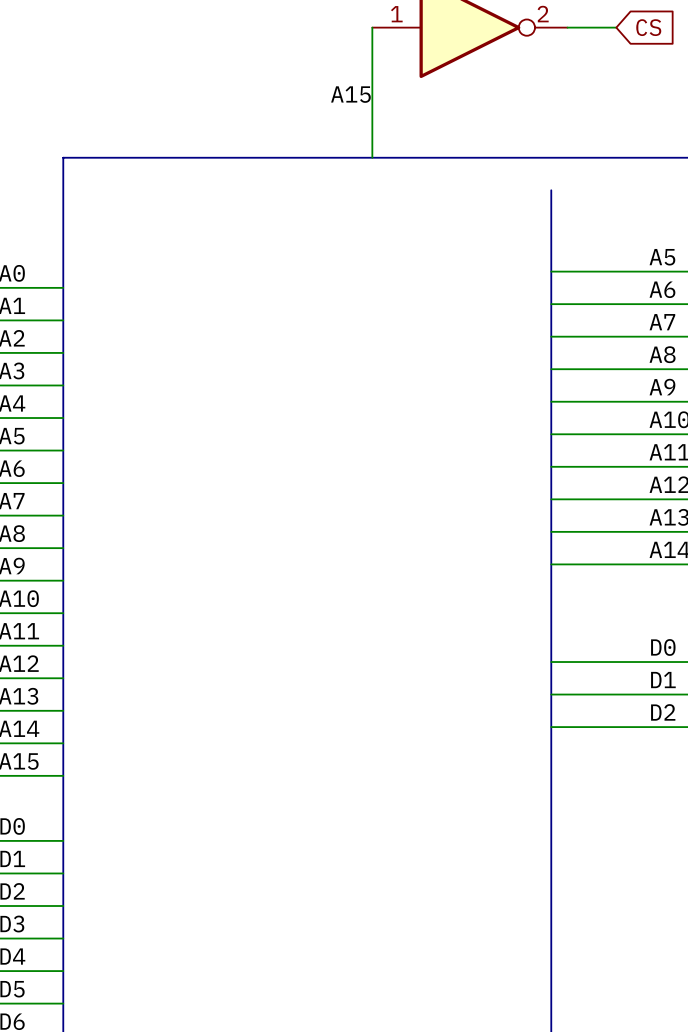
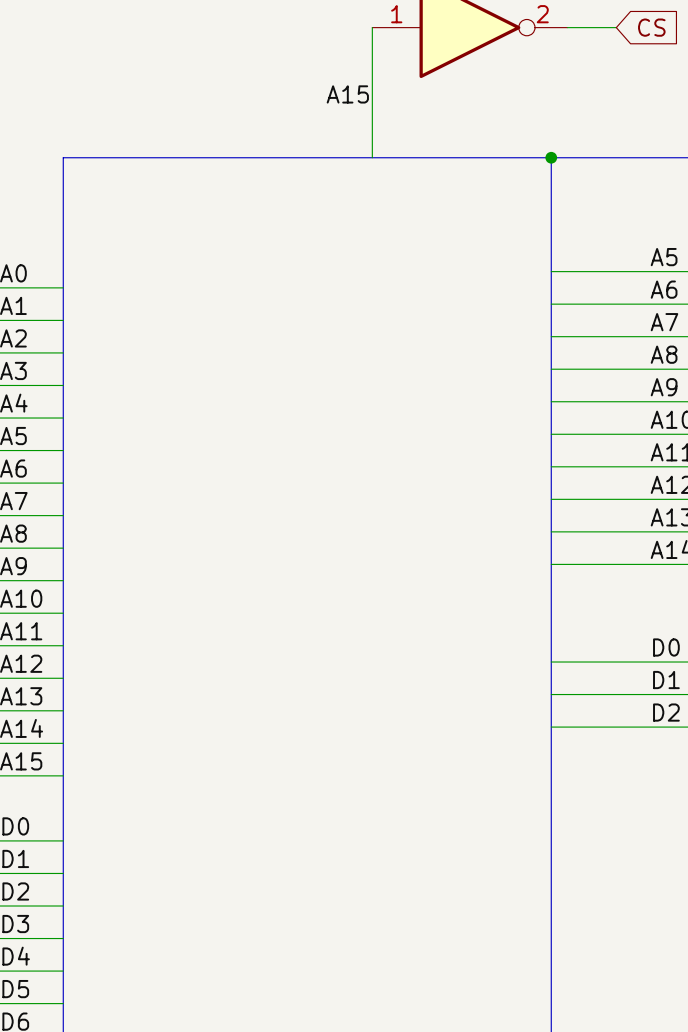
bus: none -> (551, 157) (551, 190)
junction: none -> (551, 157)

